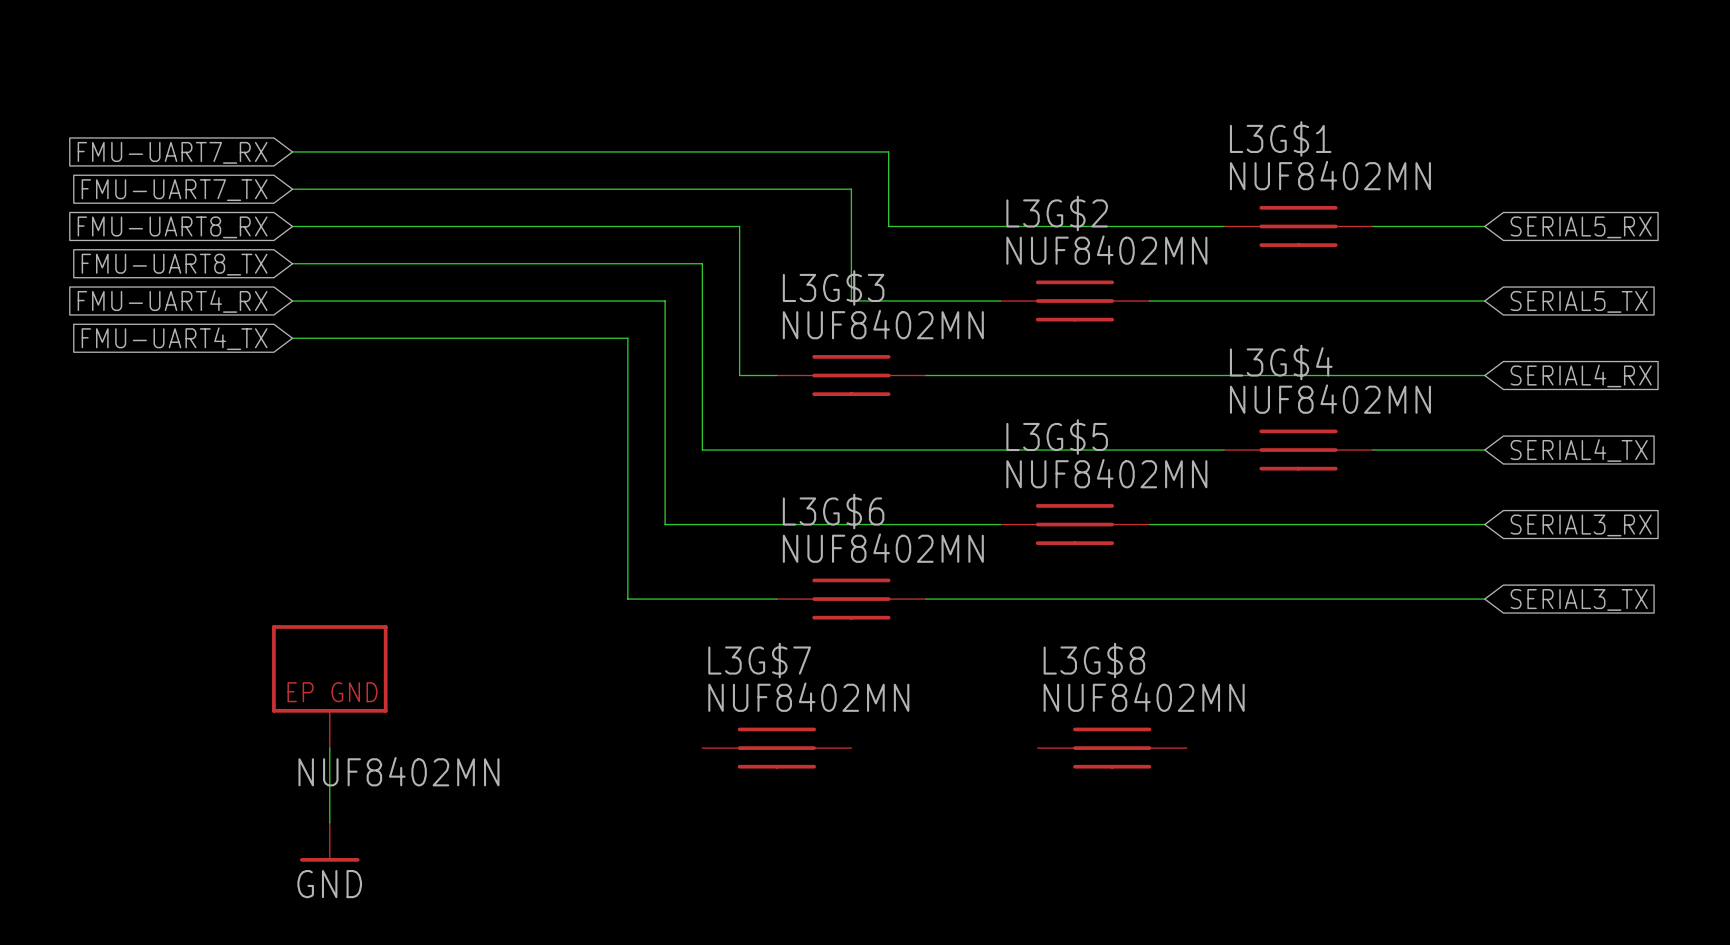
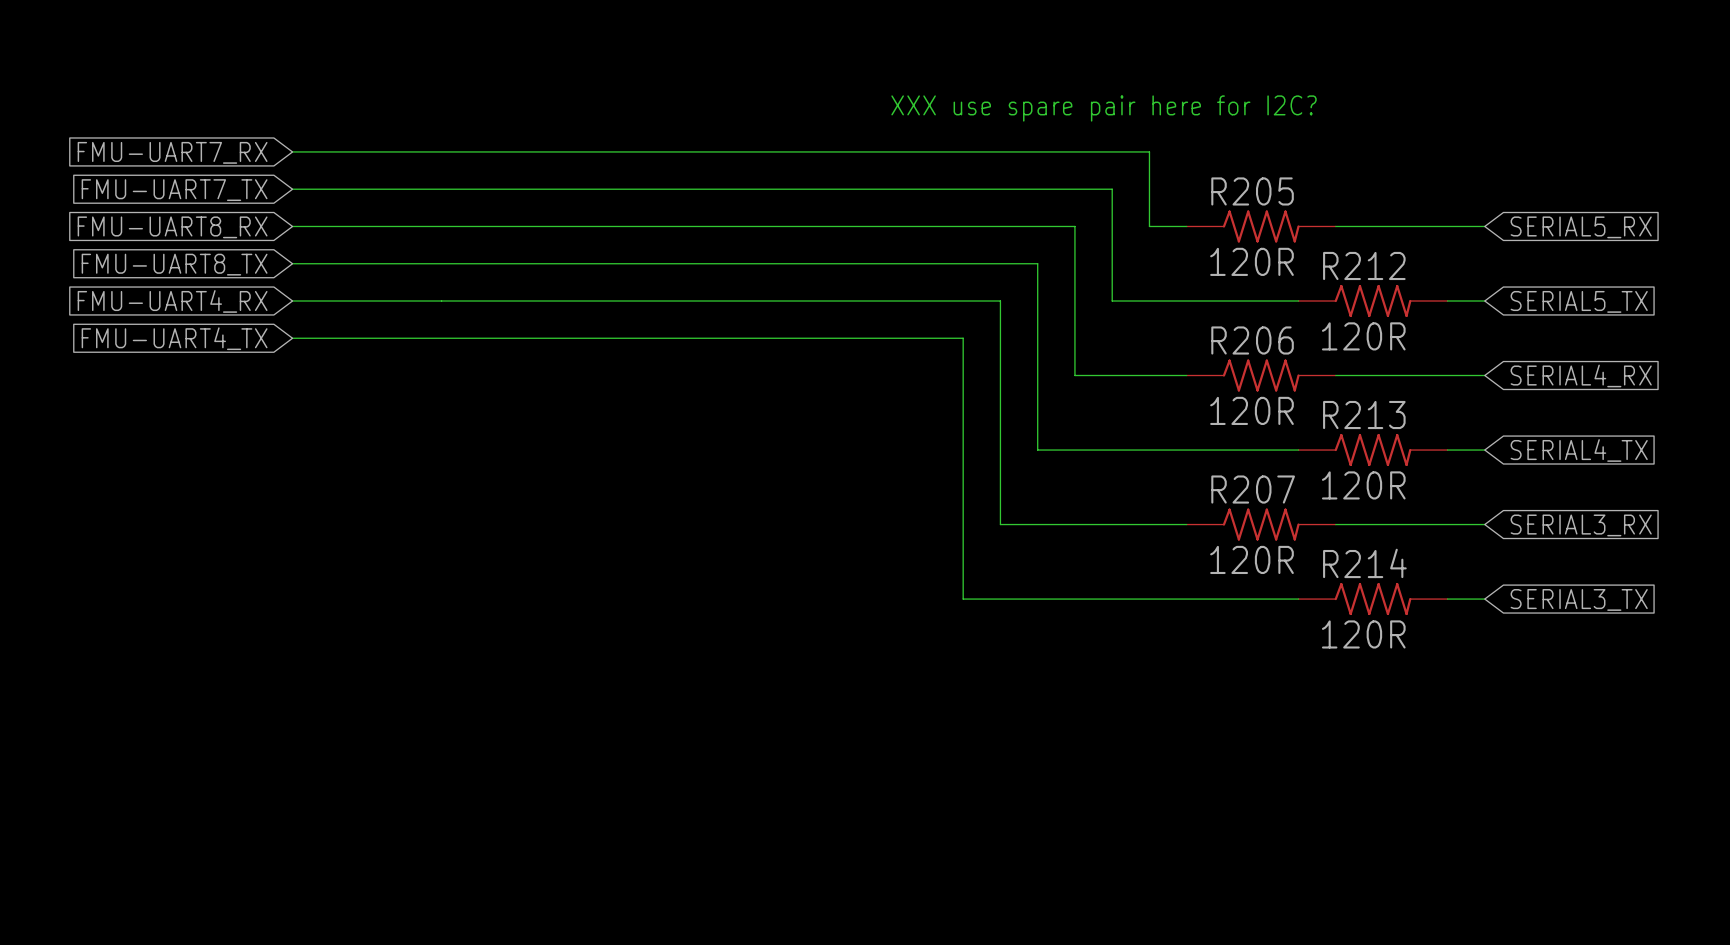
text: none -> XXX use spare pair here for I2C? (1104, 108)
wire: (888, 151) (888, 226) -> (739, 226) (888, 226)
wire: none -> (888, 151) (1149, 151) (1149, 226)
wire: (851, 189) (851, 300) -> (665, 300) (851, 300)
wire: none -> (851, 189) (1112, 189) (1112, 300) (1149, 300)
wire: (739, 226) (739, 375) (776, 375) -> none
wire: (1074, 226) (1149, 226) -> (1074, 226) (1074, 375)
R205: none -> 120R (1261, 226)
L3G$1: NUF8402MN (1298, 226) -> none
wire: (702, 263) (702, 450) (1037, 450) -> (702, 263) (1037, 263) (1037, 450)
wire: (665, 300) (665, 524) (1000, 524) -> none
wire: none -> (1000, 300) (1000, 524) (1149, 524)
L3G$2: NUF8402MN (1074, 300) -> none
R212: none -> 120R (1373, 300)
wire: (627, 338) (627, 599) (776, 599) -> (627, 338) (963, 338) (963, 599)
L3G$3: NUF8402MN (851, 375) -> none
wire: (925, 375) (1074, 375) -> none
R206: none -> 120R (1261, 375)
L3G$4: NUF8402MN (1298, 450) -> none
R213: none -> 120R (1373, 450)
L3G$5: NUF8402MN (1074, 524) -> none
R207: none -> 120R (1261, 524)
L3G$6: NUF8402MN (851, 599) -> none
wire: (925, 599) (963, 599) -> none
R214: none -> 120R (1373, 599)
part: NUF8402MN (329, 686) -> none
wire: (329, 748) (329, 822) -> none
L3G$7: NUF8402MN (776, 748) -> none
L3G$8: NUF8402MN (1112, 748) -> none
power symbol: GND (329, 842) -> none

